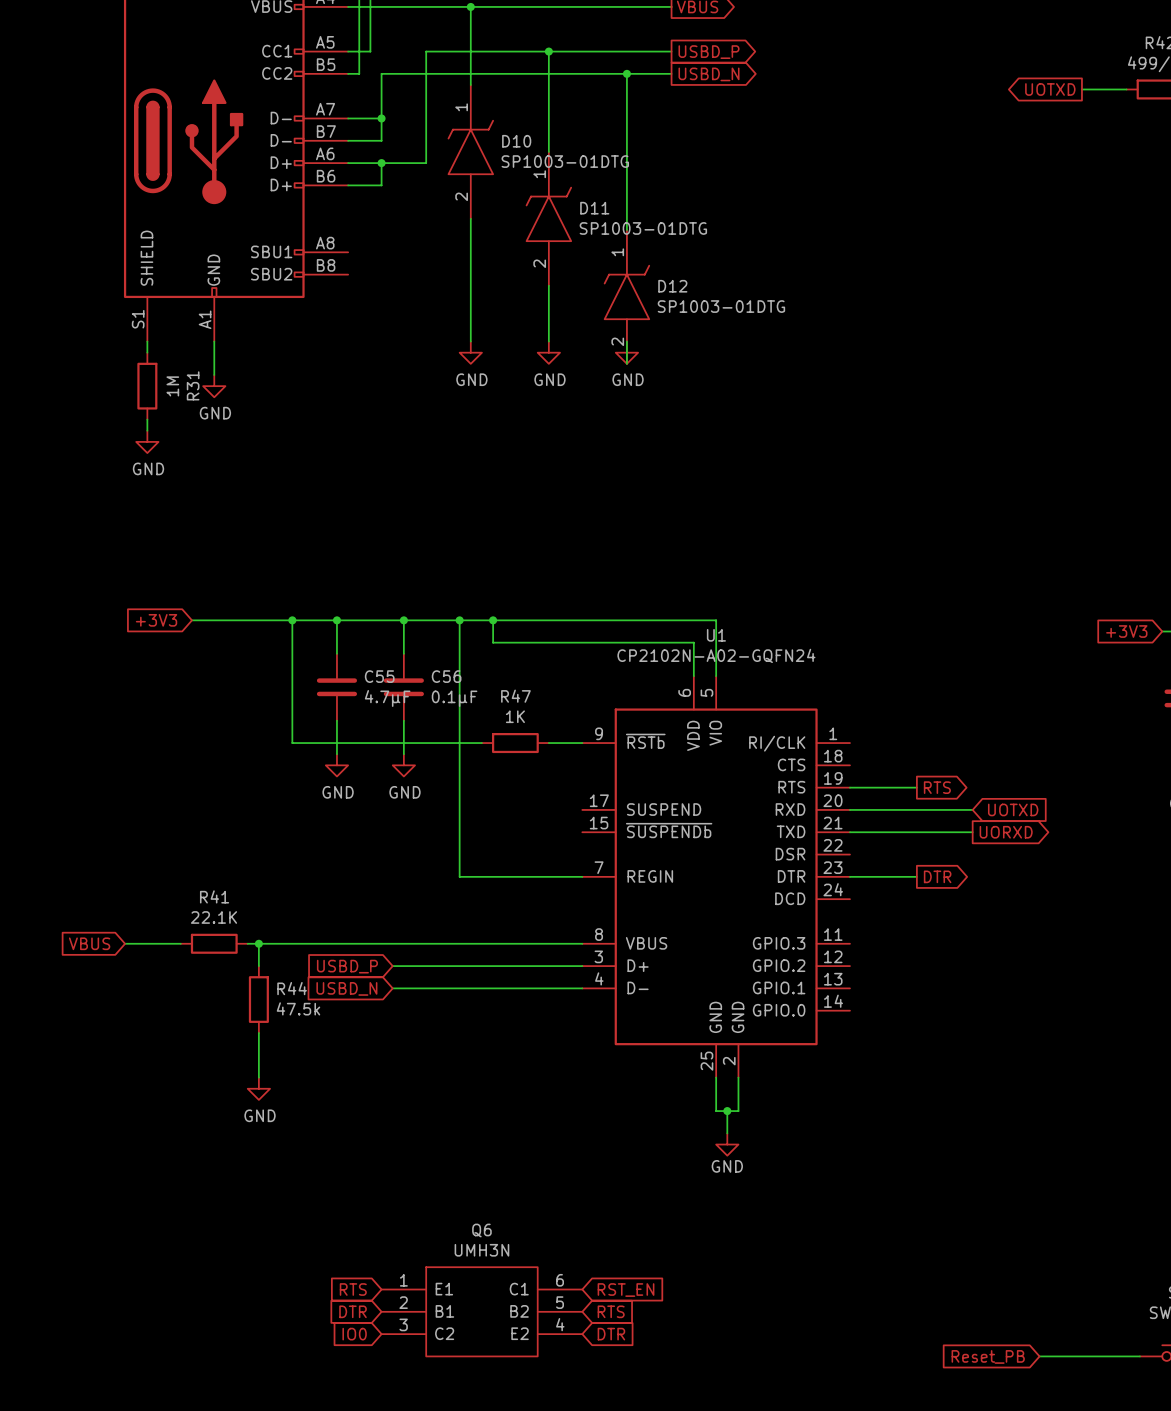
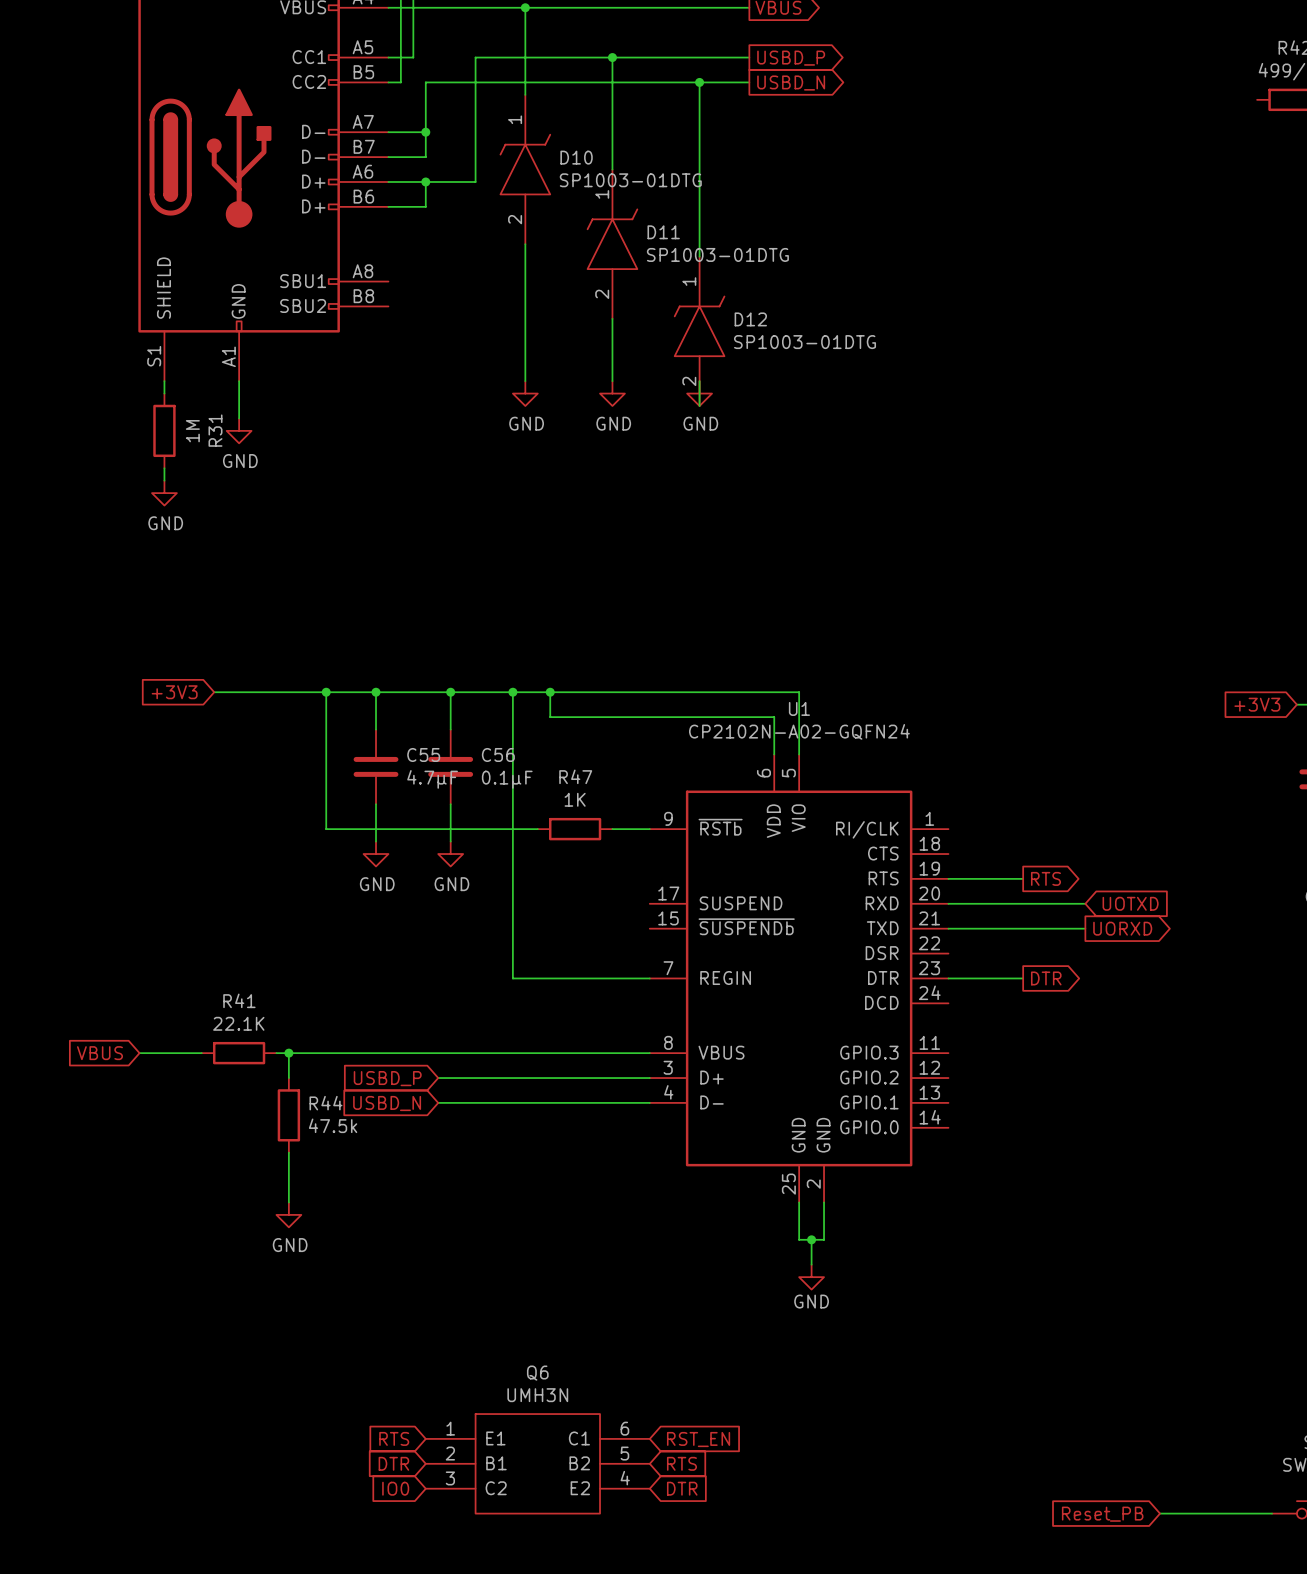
global label: UOTXD (1050, 89) -> none
wire: (1081, 89) (1126, 89) -> none

